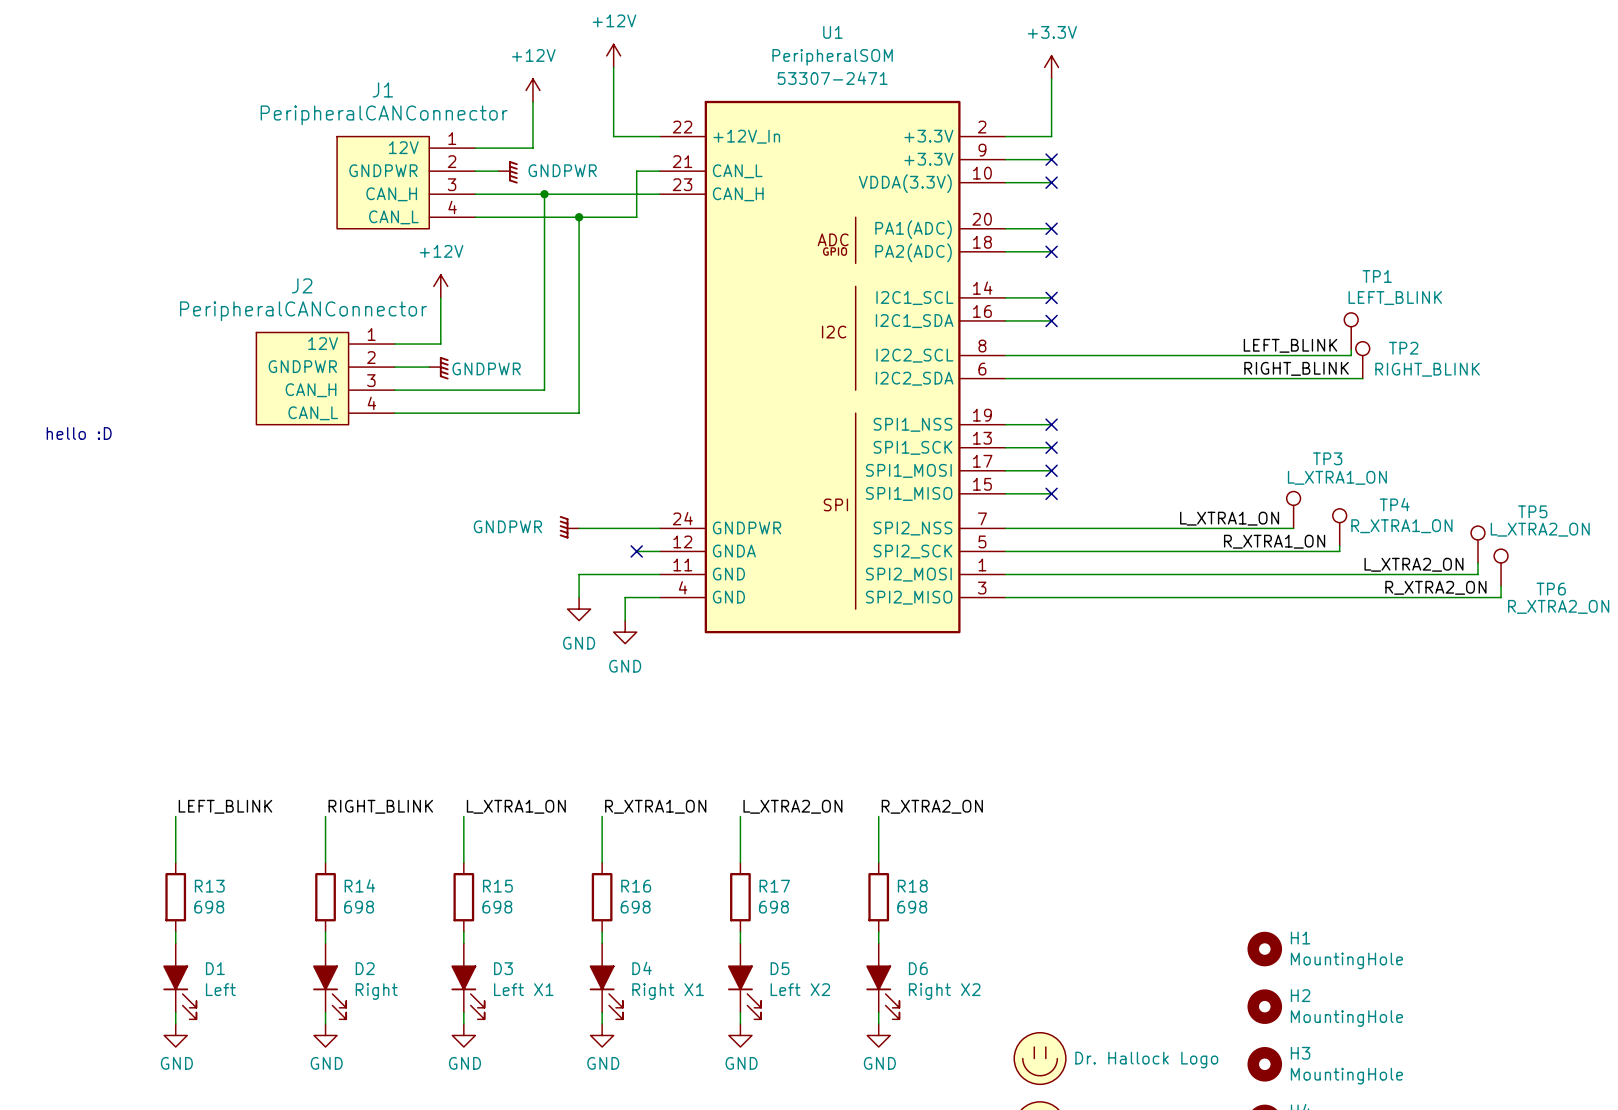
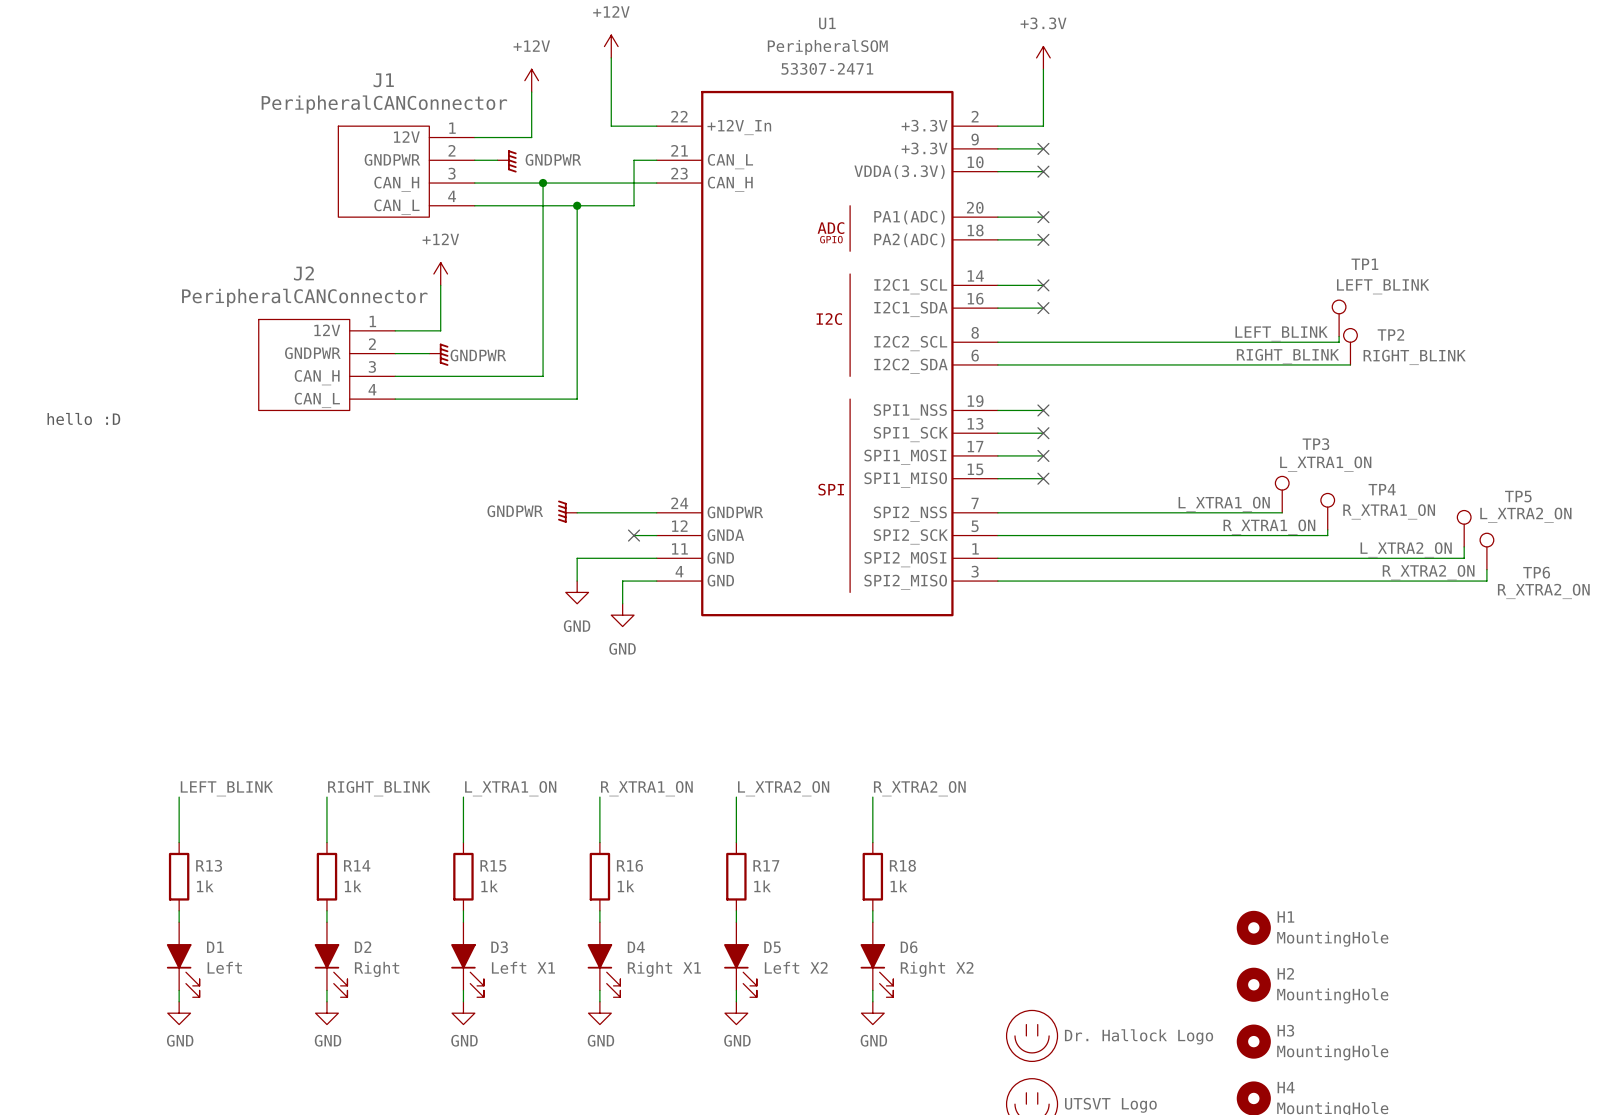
R13 value: 698 (209, 907) -> 1k (205, 886)
R14 value: 698 (359, 907) -> 1k (353, 886)
R15 value: 698 (497, 907) -> 1k (489, 886)
R16 value: 698 (635, 907) -> 1k (626, 886)
R17 value: 698 (773, 907) -> 1k (762, 886)
R18 value: 698 (912, 907) -> 1k (898, 886)

